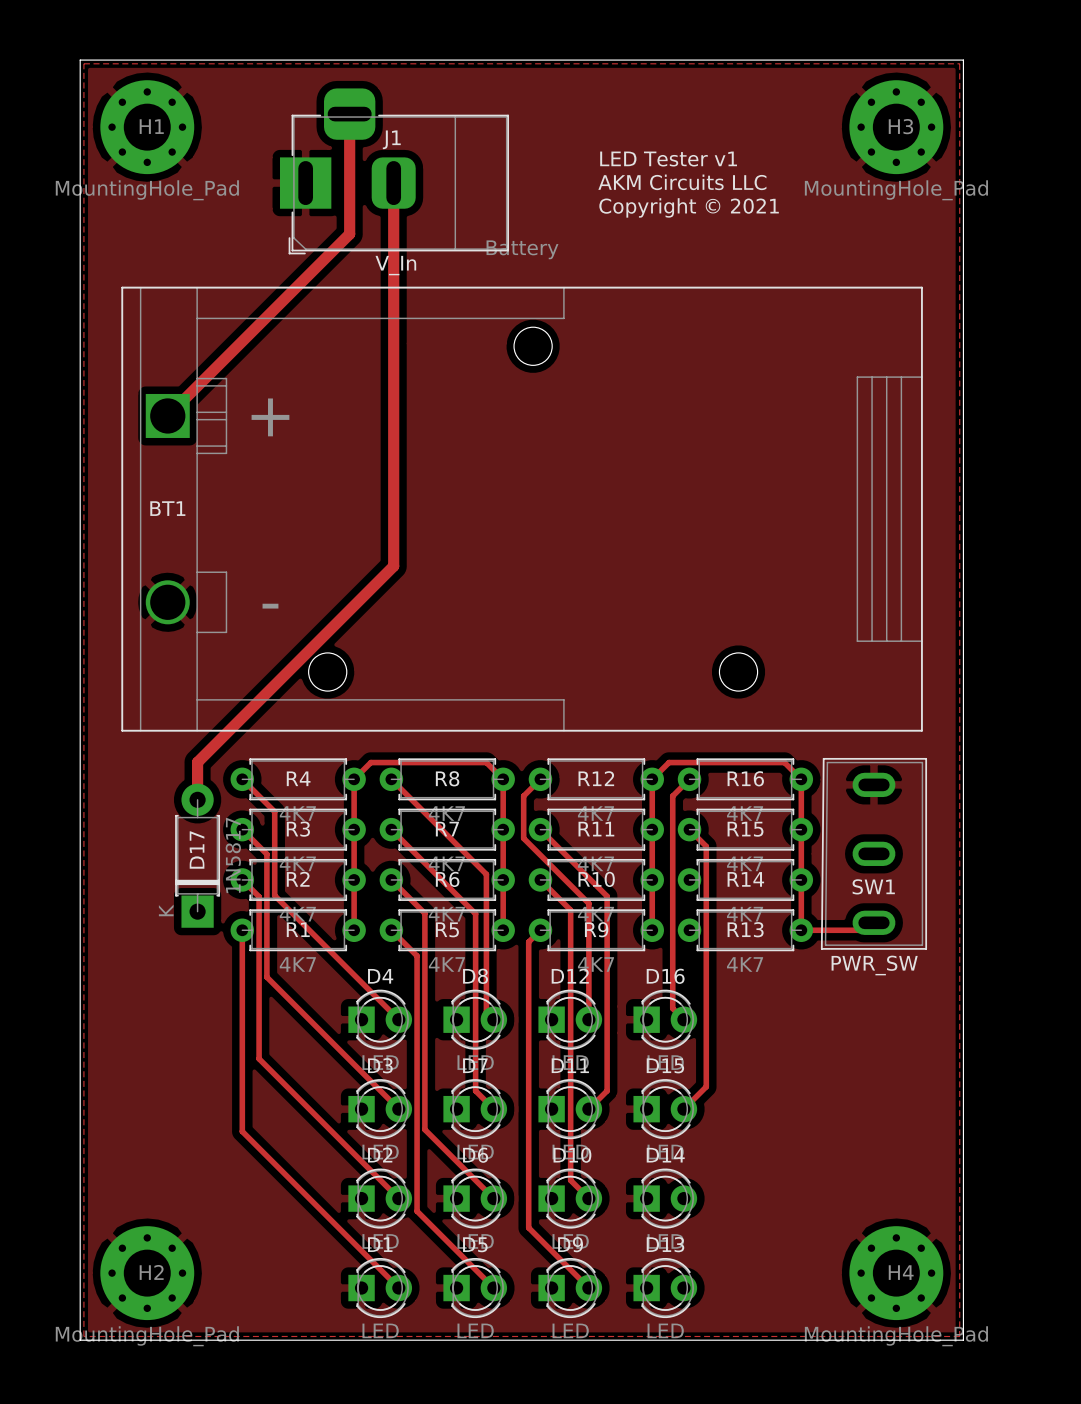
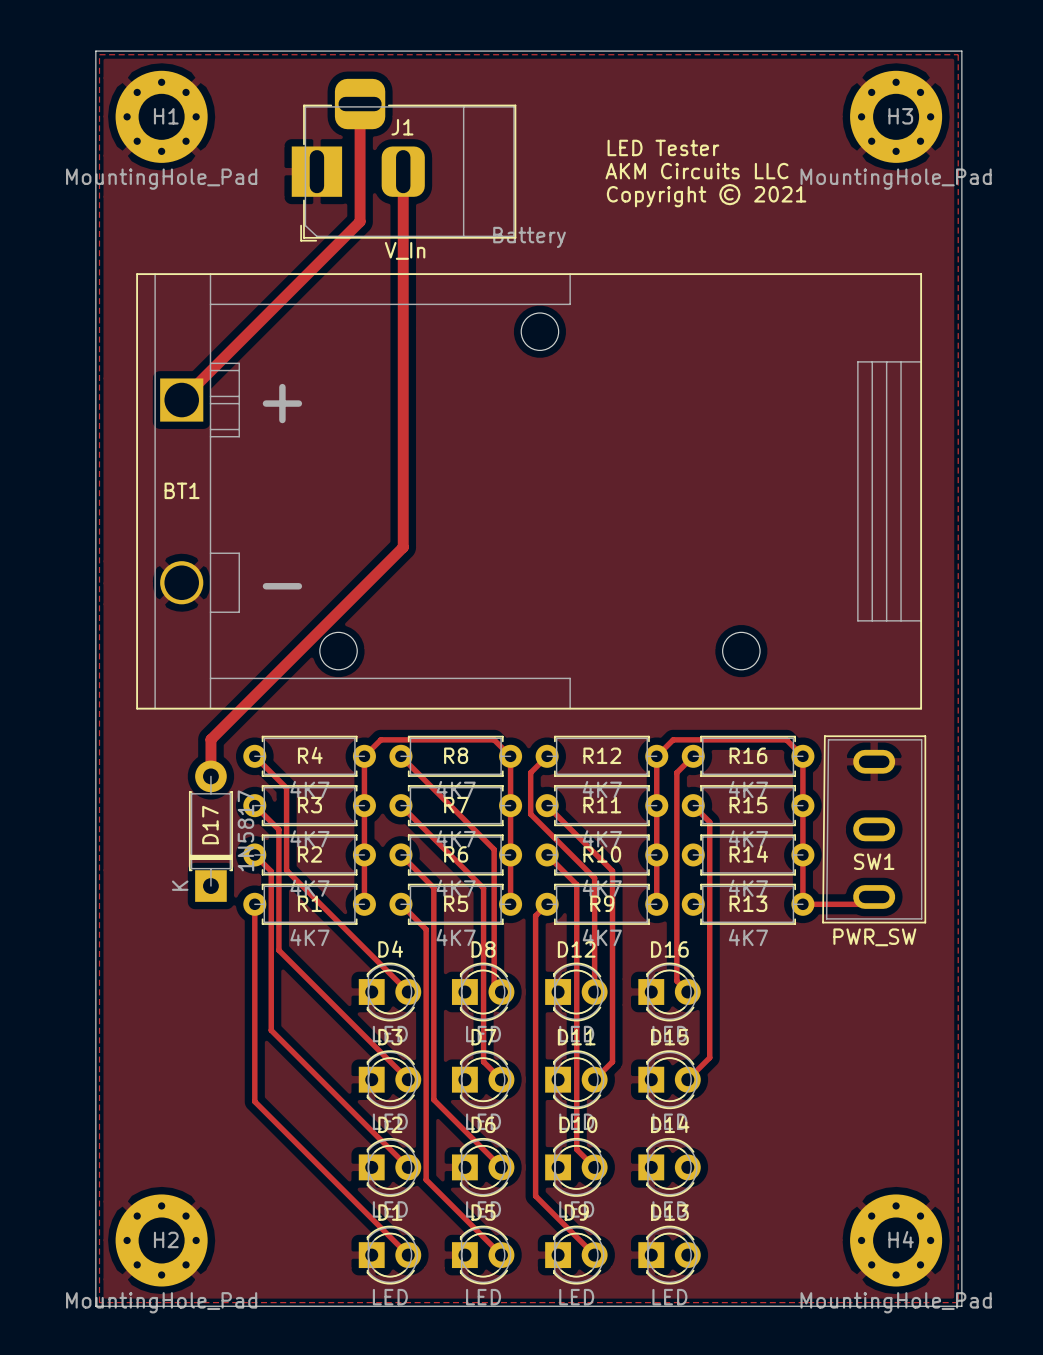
text: LED Tester v1 (668, 159) -> LED Tester (663, 147)

